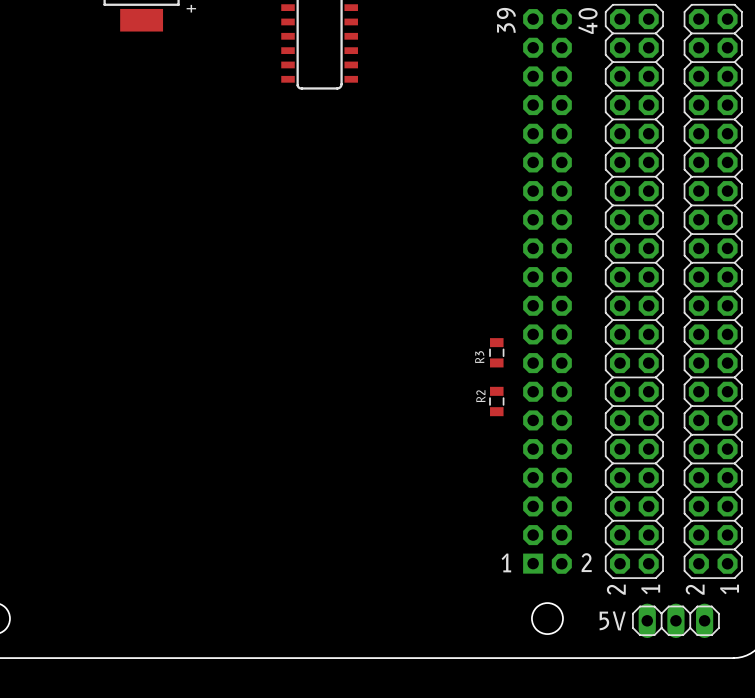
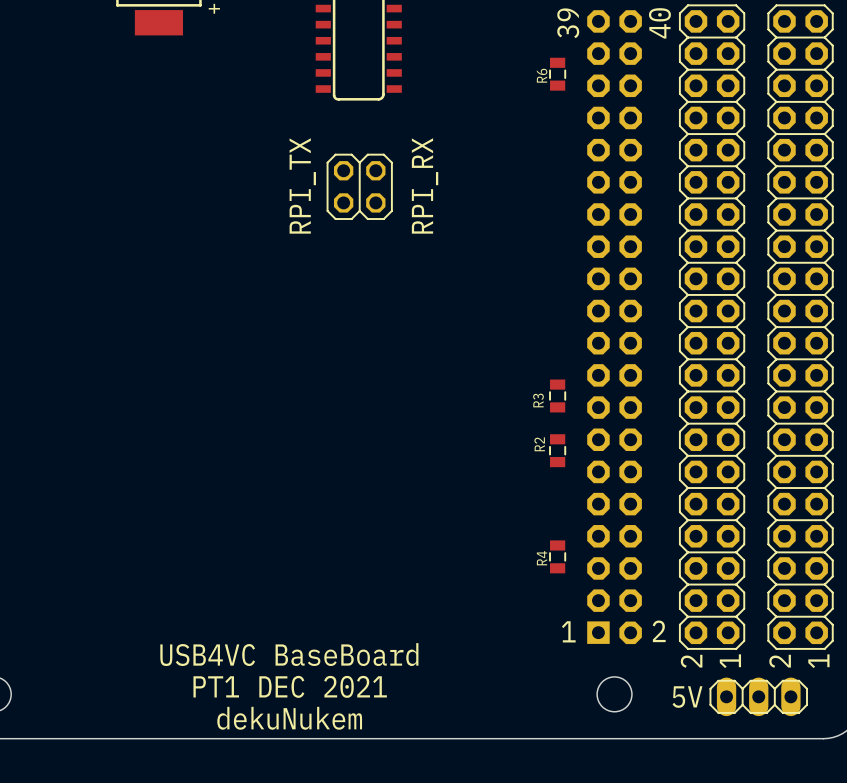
R6: none -> (557, 74)
text: none -> RPI_TX (302, 185)
text: none -> RPI_RX (425, 185)
part: none -> (359, 186)
R4: none -> (557, 556)
text: none -> USB4VC BaseBoard (289, 654)
text: none -> PT1 DEC 2021 (290, 686)
text: none -> dekuNukem (289, 718)

